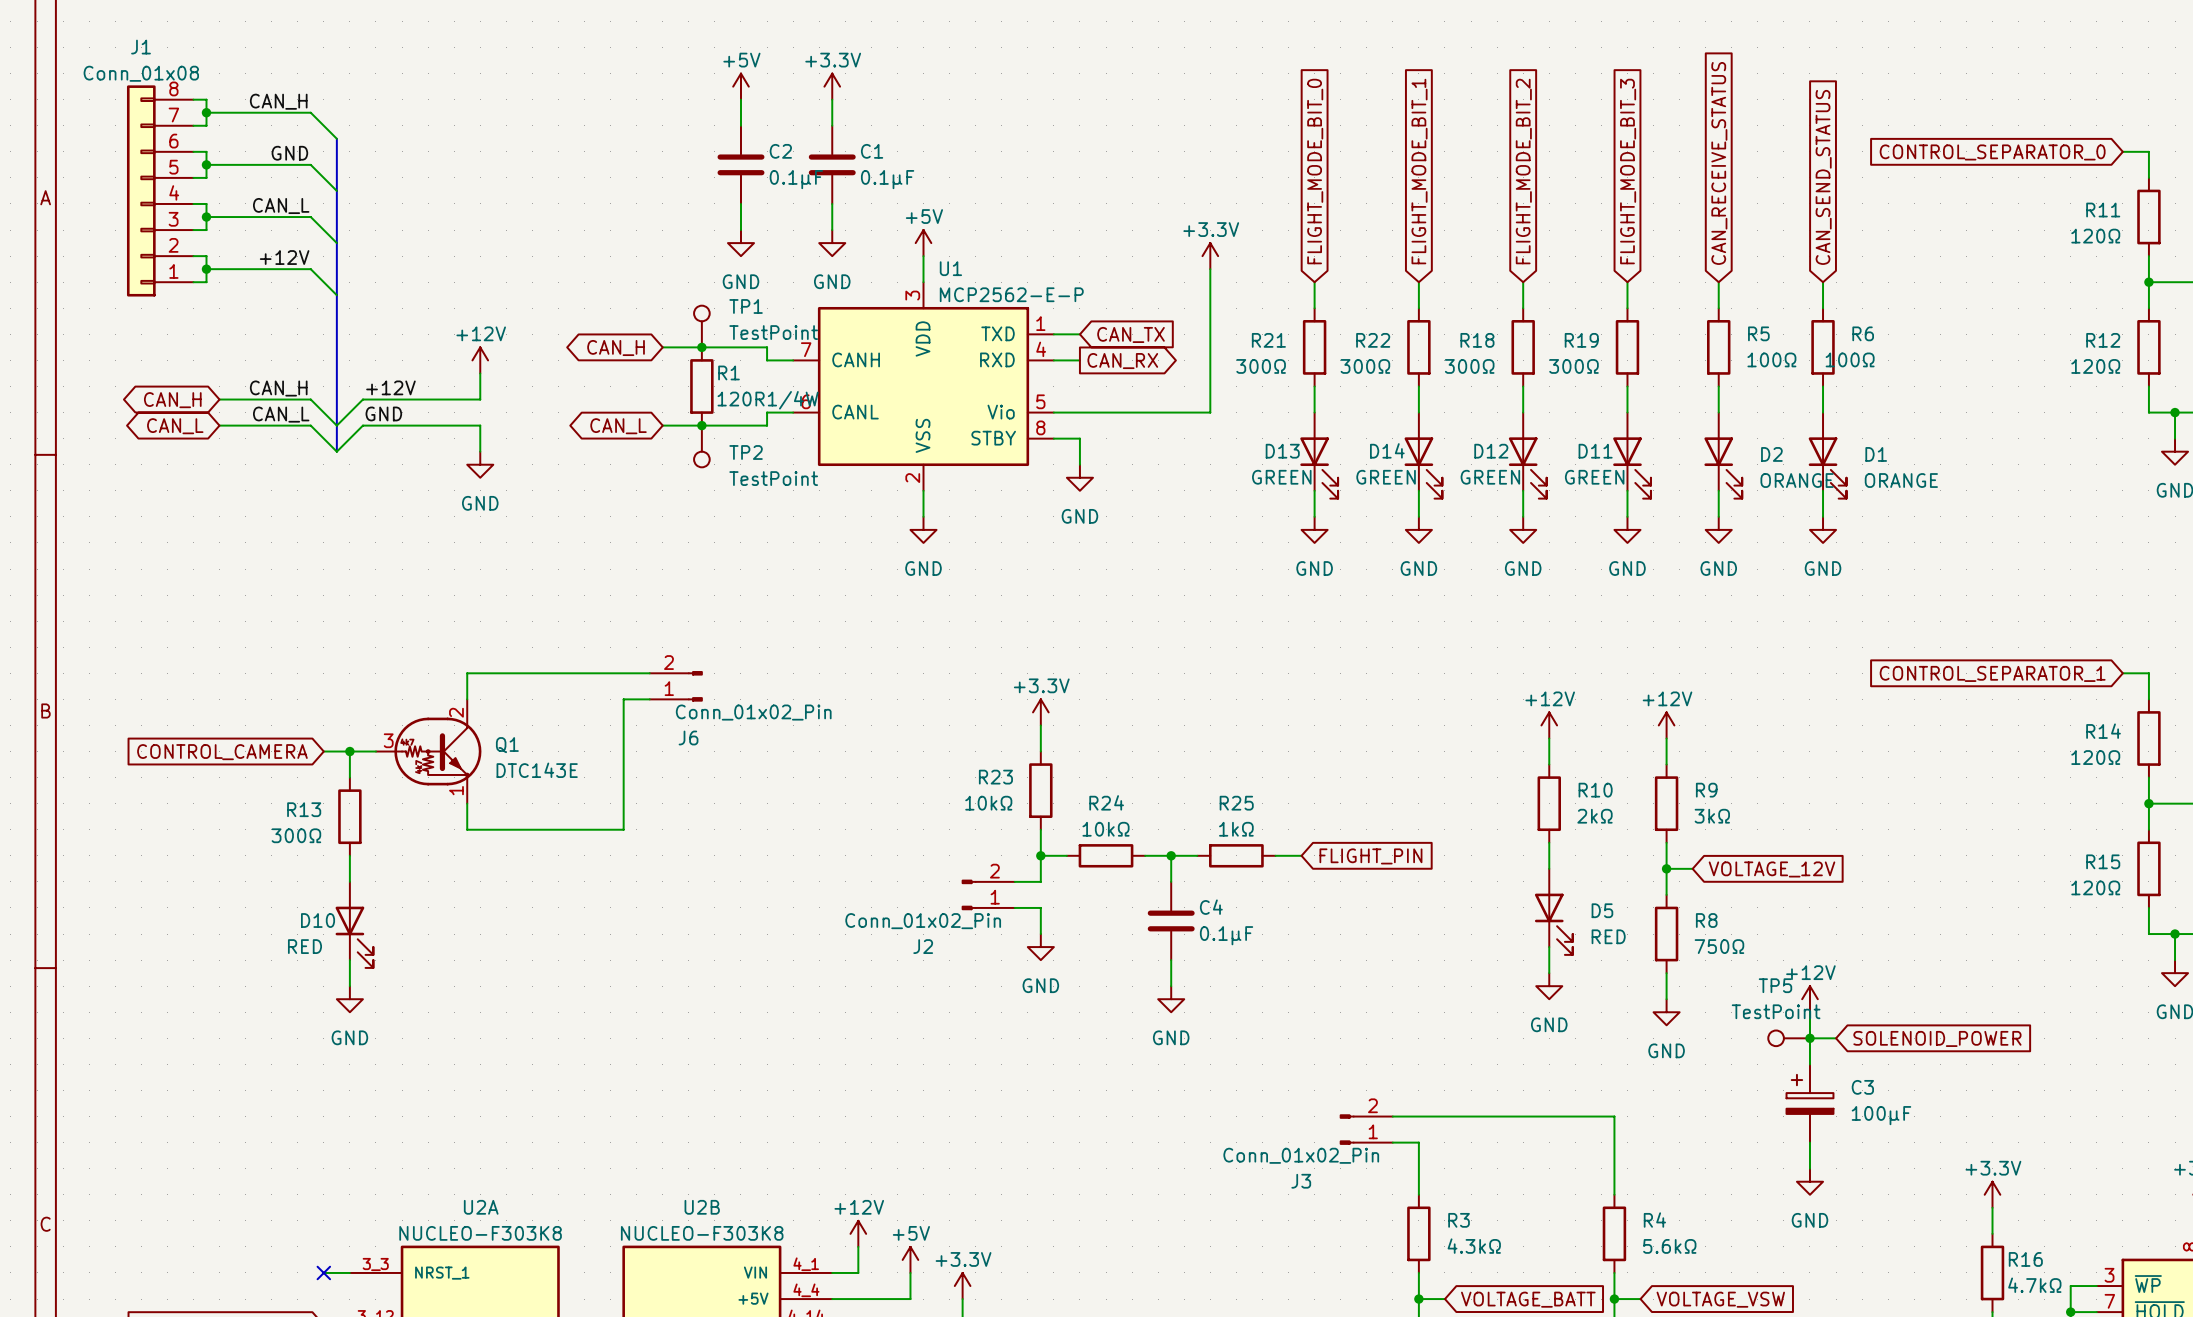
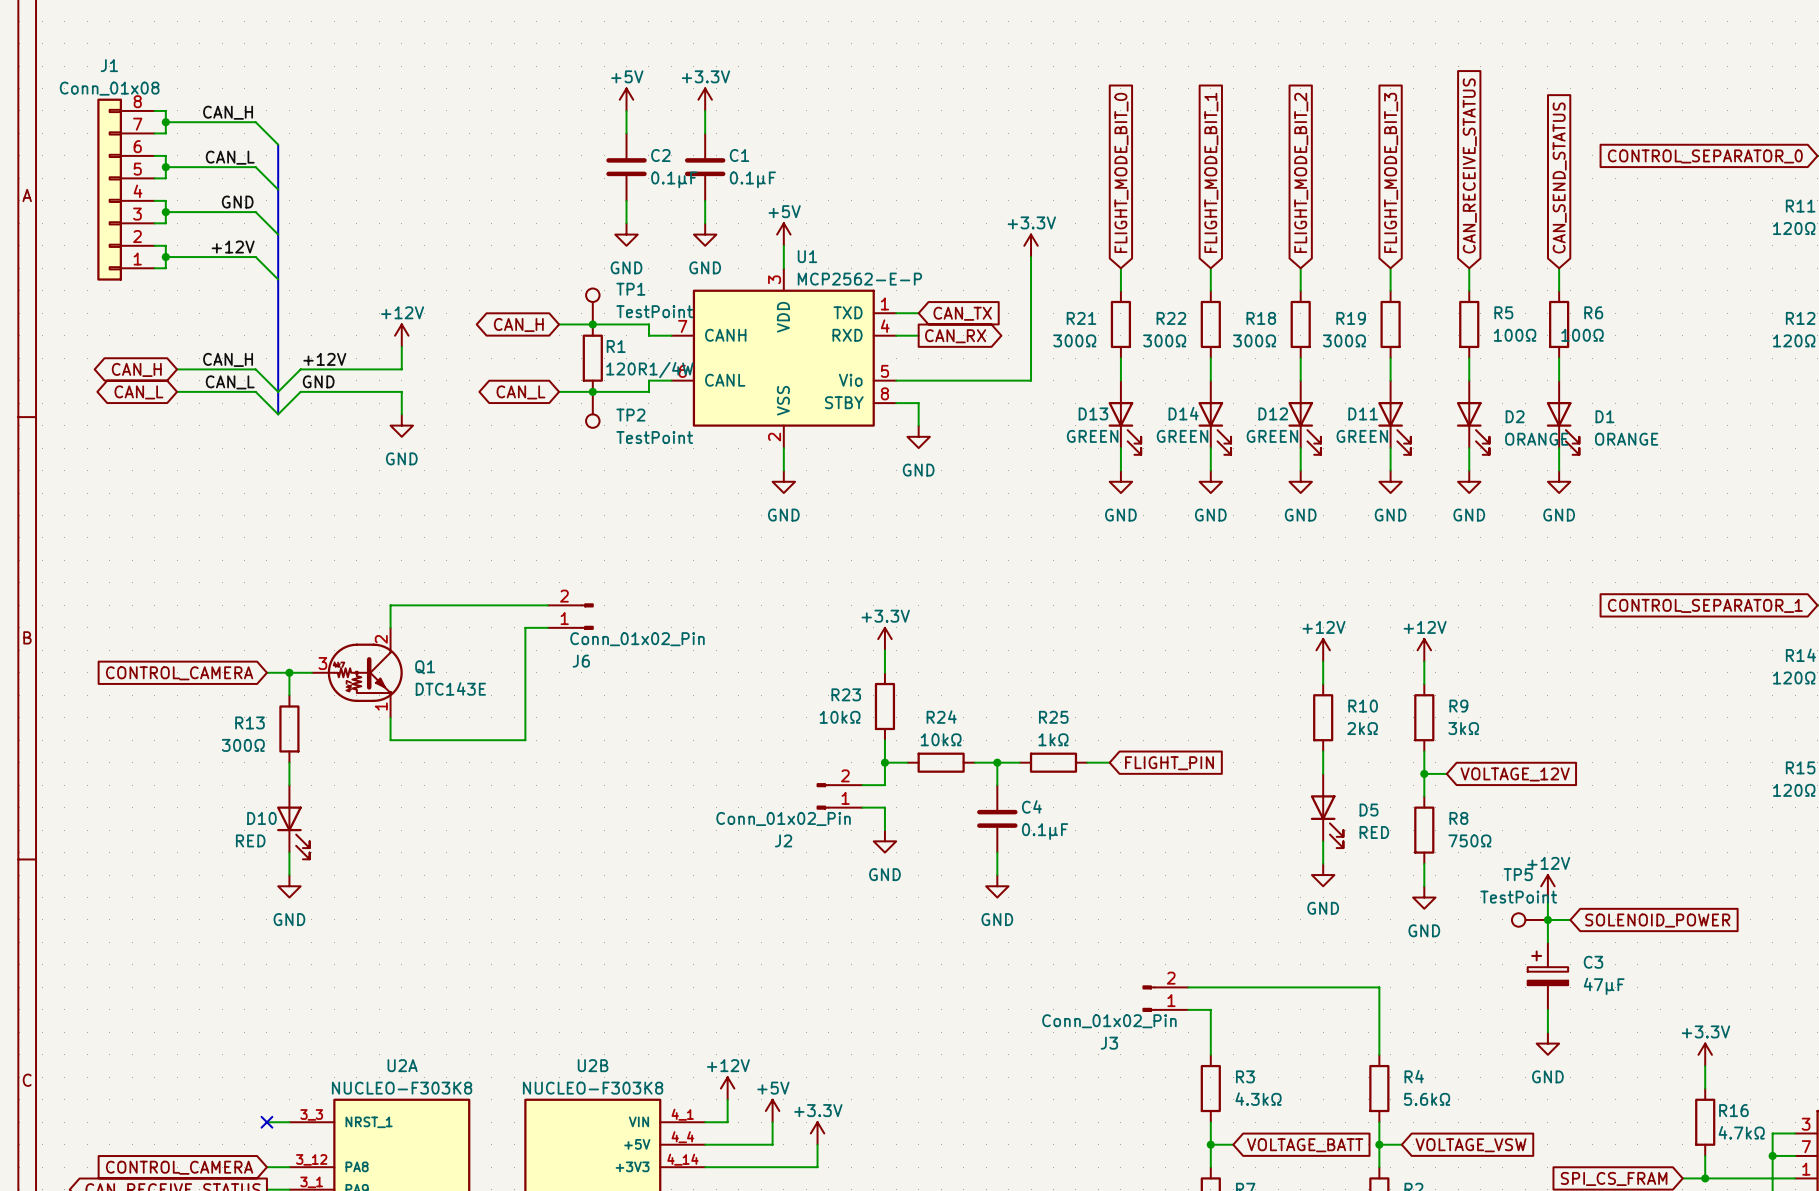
label: GND (289, 153) -> CAN_L (230, 157)
label: CAN_L (281, 206) -> GND (237, 202)
C3 value: 100μF (1881, 1115) -> 47μF (1604, 986)

